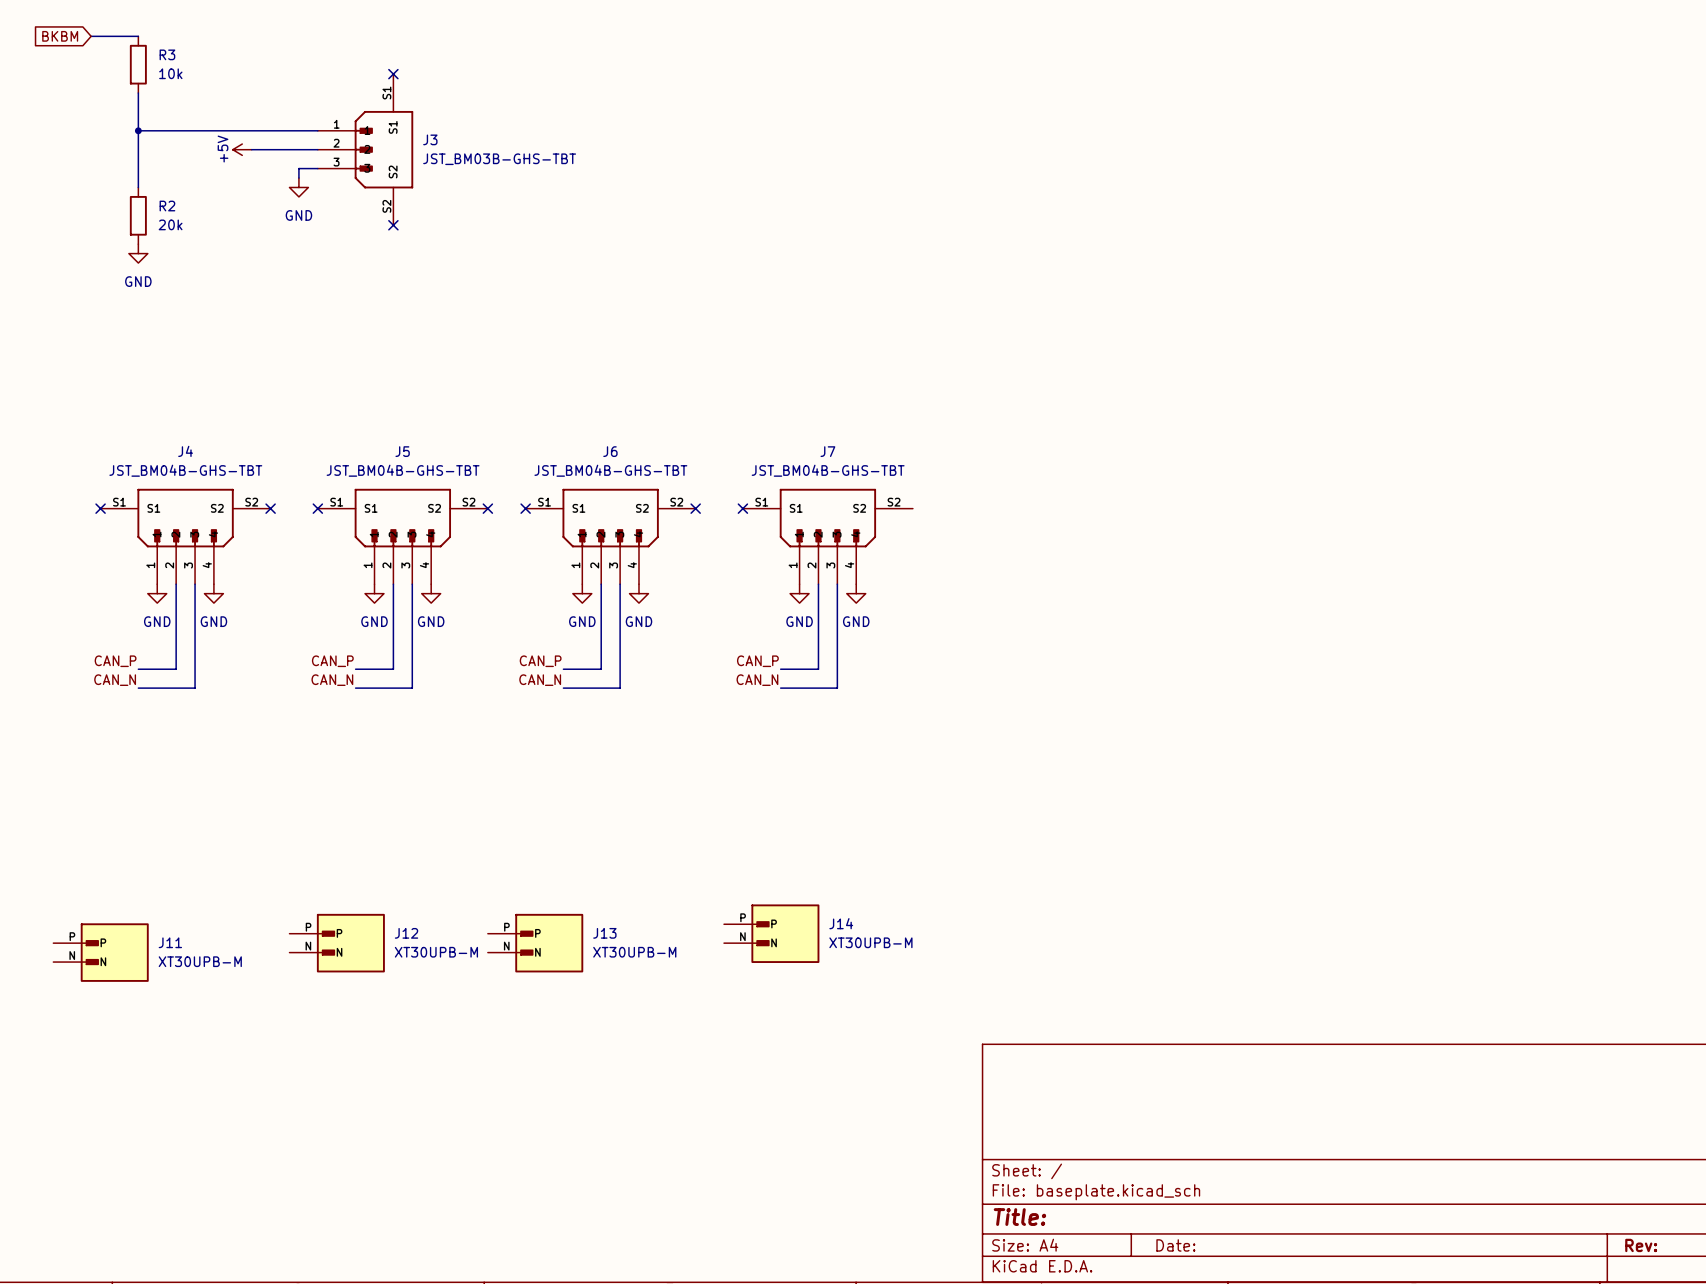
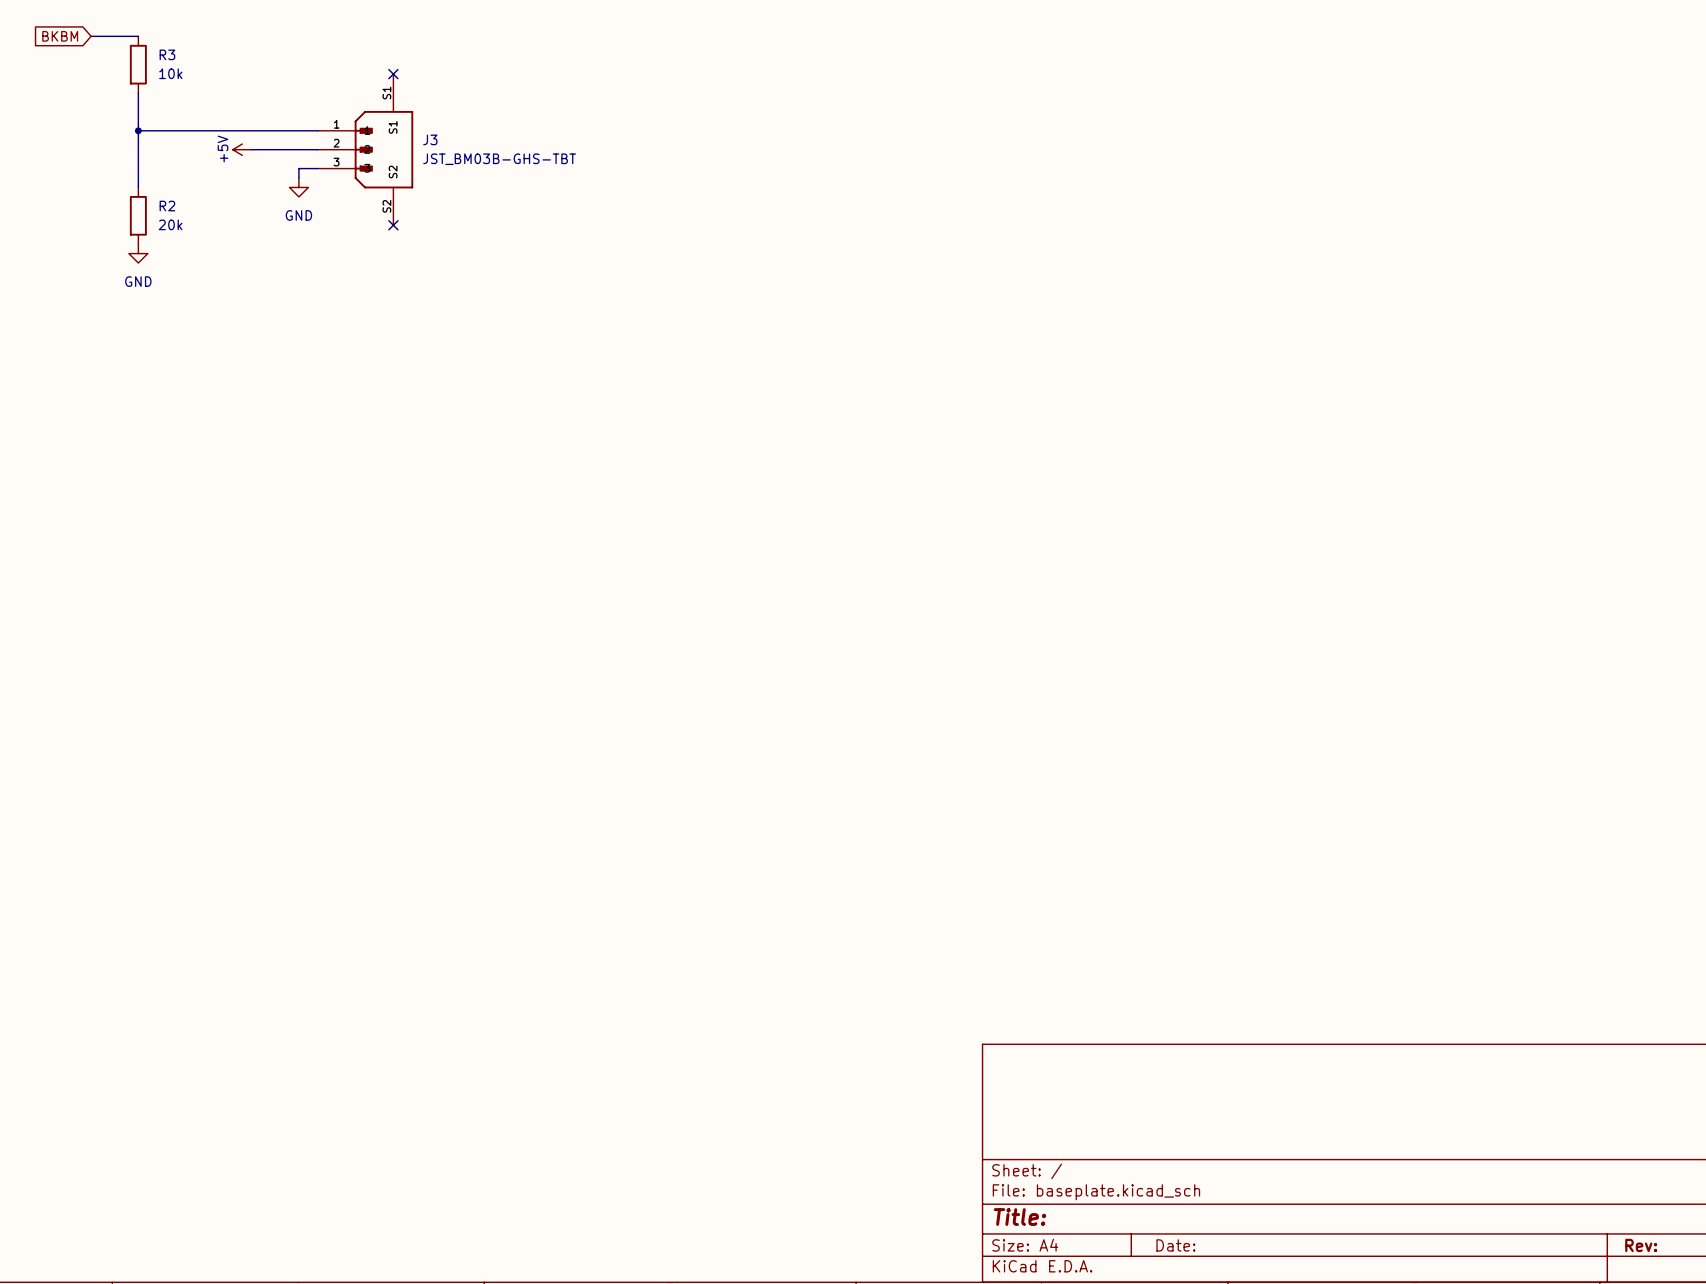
no-connect mark: (100, 508) -> none
no-connect mark: (270, 508) -> none
no-connect mark: (317, 508) -> none
no-connect mark: (487, 508) -> none
no-connect mark: (525, 508) -> none
no-connect mark: (695, 508) -> none
no-connect mark: (742, 508) -> none
J4: JST_BM04B-GHS-TBT (185, 536) -> none
J5: JST_BM04B-GHS-TBT (402, 536) -> none
J6: JST_BM04B-GHS-TBT (610, 536) -> none
J7: JST_BM04B-GHS-TBT (827, 536) -> none
wire: (176, 584) (176, 669) (138, 669) -> none
wire: (195, 584) (195, 688) (138, 688) -> none
wire: (393, 584) (393, 669) (355, 669) -> none
wire: (412, 584) (412, 688) (355, 688) -> none
wire: (601, 584) (601, 669) (563, 669) -> none
wire: (620, 584) (620, 688) (563, 688) -> none
wire: (818, 584) (818, 669) (780, 669) -> none
wire: (837, 584) (837, 688) (780, 688) -> none
power symbol: GND (157, 593) -> none
power symbol: GND (213, 593) -> none
power symbol: GND (374, 593) -> none
power symbol: GND (431, 593) -> none
power symbol: GND (582, 593) -> none
power symbol: GND (638, 593) -> none
power symbol: GND (799, 593) -> none
power symbol: GND (856, 593) -> none
label: CAN_P (115, 661) -> none
label: CAN_P (332, 661) -> none
label: CAN_P (540, 661) -> none
label: CAN_P (757, 661) -> none
label: CAN_N (115, 680) -> none
label: CAN_N (332, 680) -> none
label: CAN_N (540, 680) -> none
label: CAN_N (757, 680) -> none
J14: XT30UPB-M (771, 933) -> none
J12: XT30UPB-M (337, 943) -> none
J13: XT30UPB-M (535, 943) -> none
J11: XT30UPB-M (101, 952) -> none

